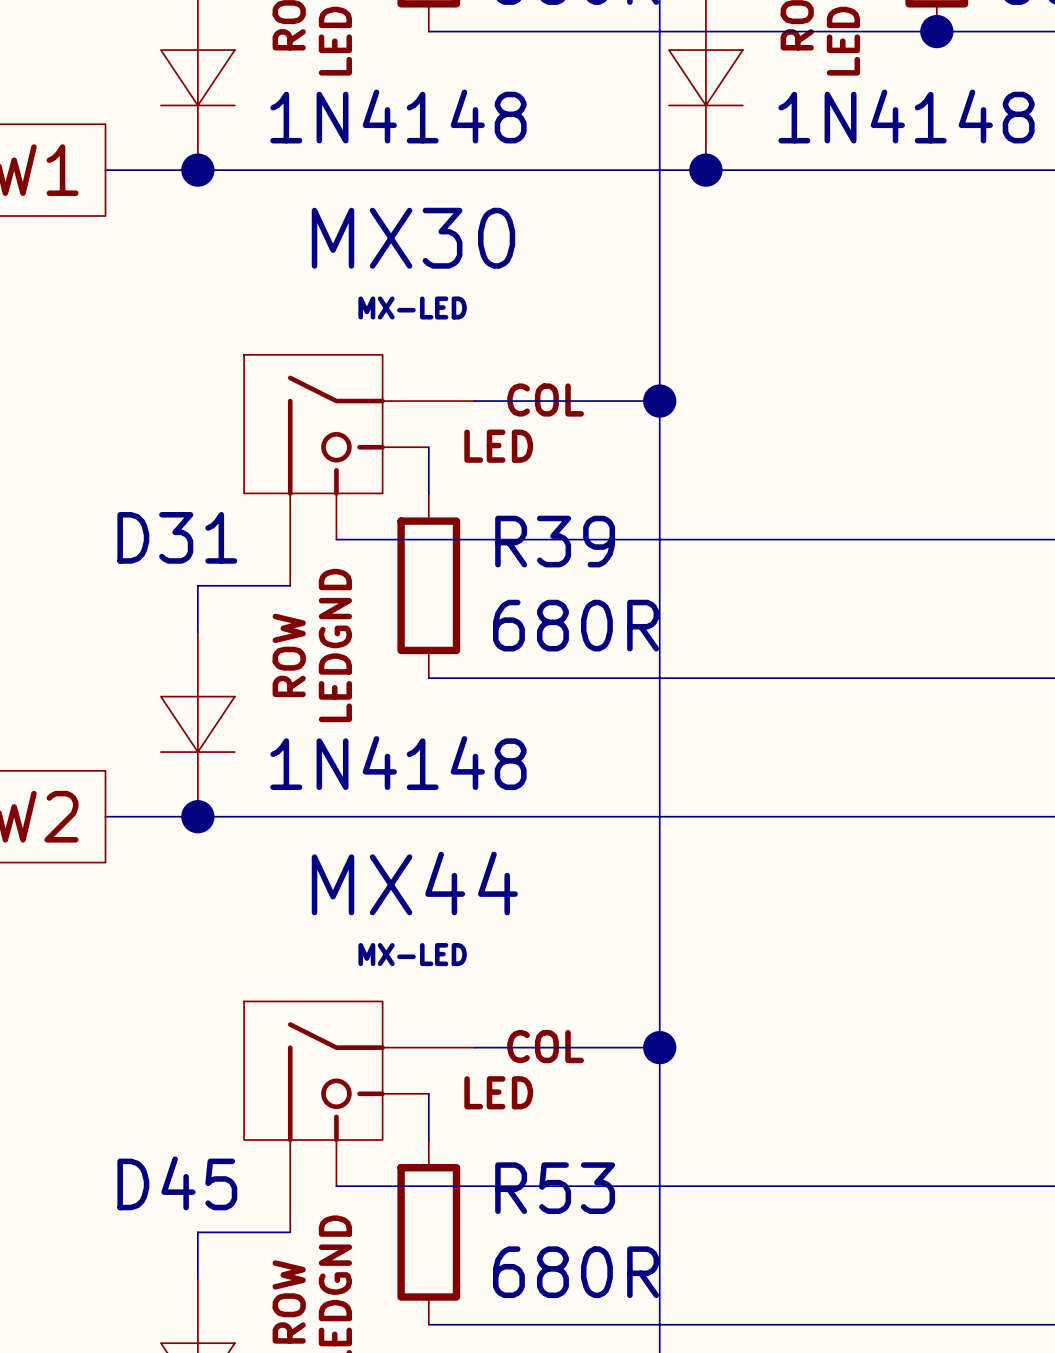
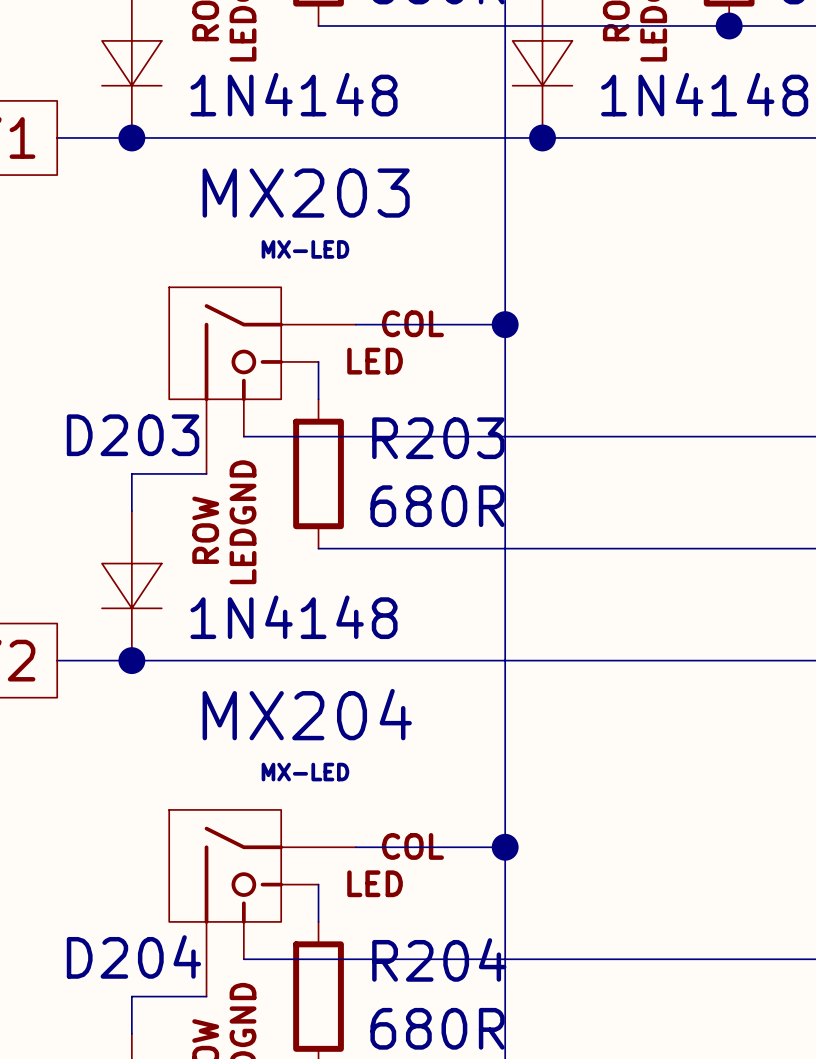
MX30 name: MX30 (413, 238) -> MX203 (306, 193)
D31 name: D31 (177, 537) -> D203 (133, 435)
R39 name: R39 (555, 541) -> R203 (438, 438)
MX44 name: MX44 (414, 883) -> MX204 (307, 714)
D45 name: D45 (177, 1183) -> D204 (133, 956)
R53 name: R53 (555, 1188) -> R204 (439, 959)

